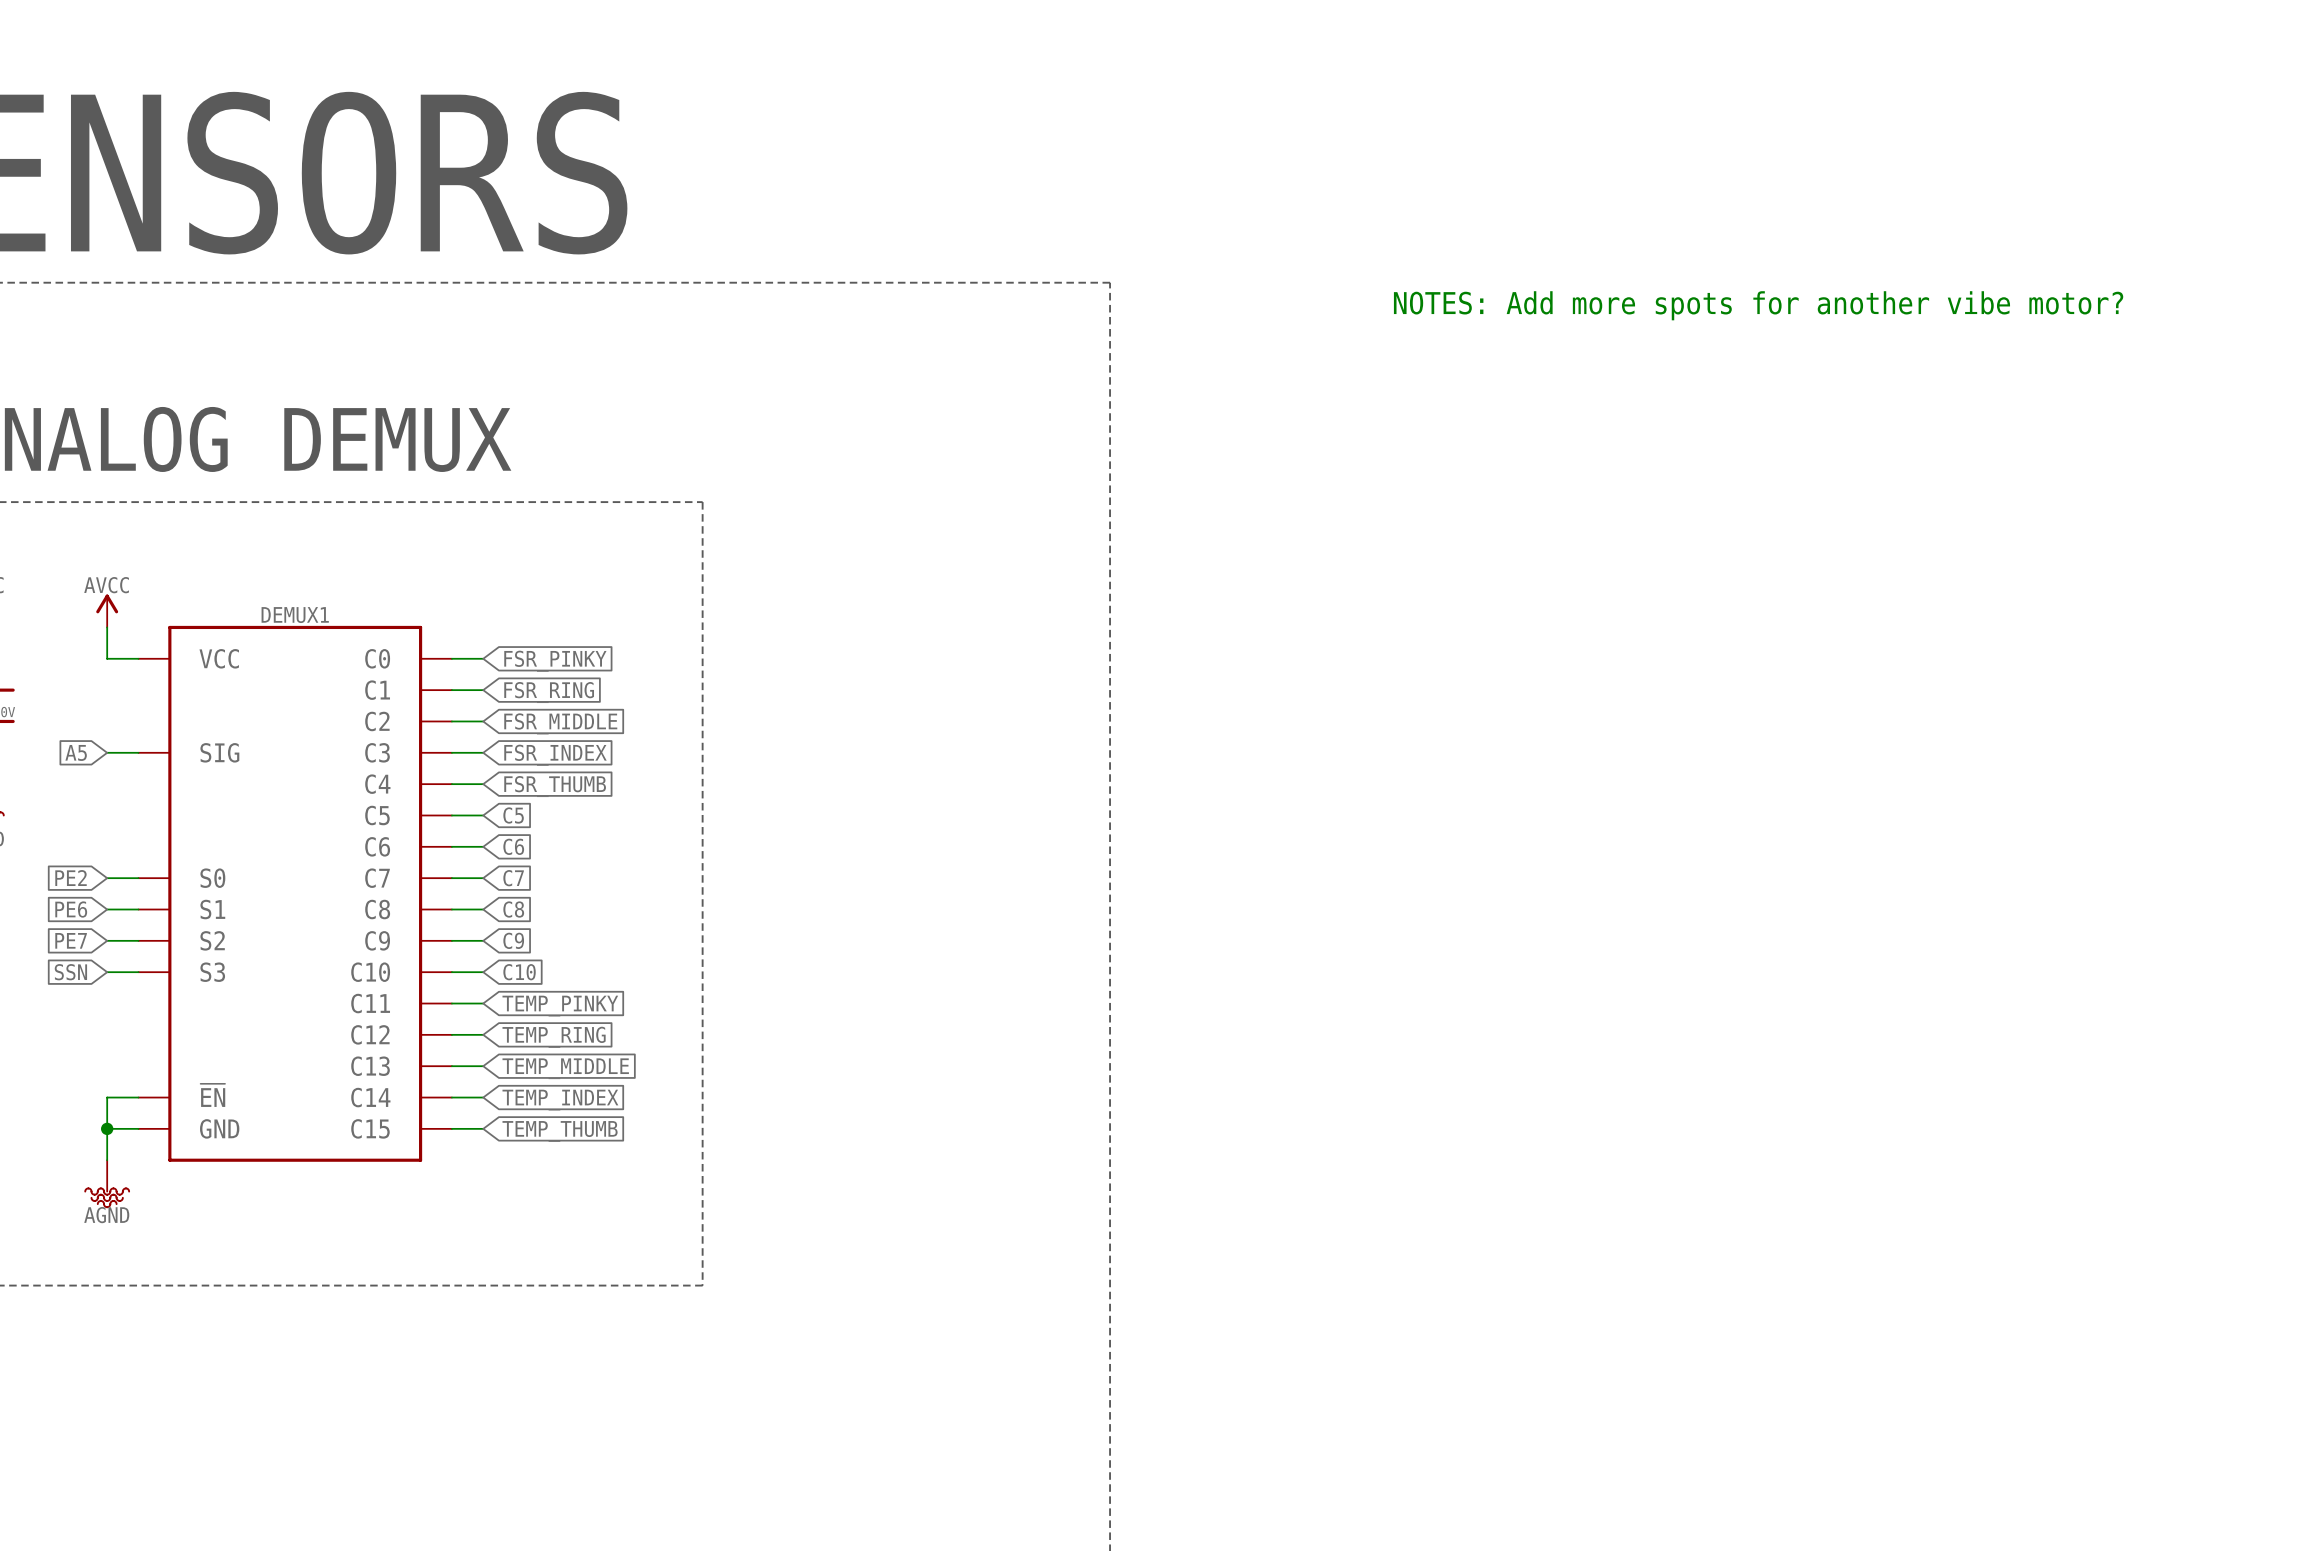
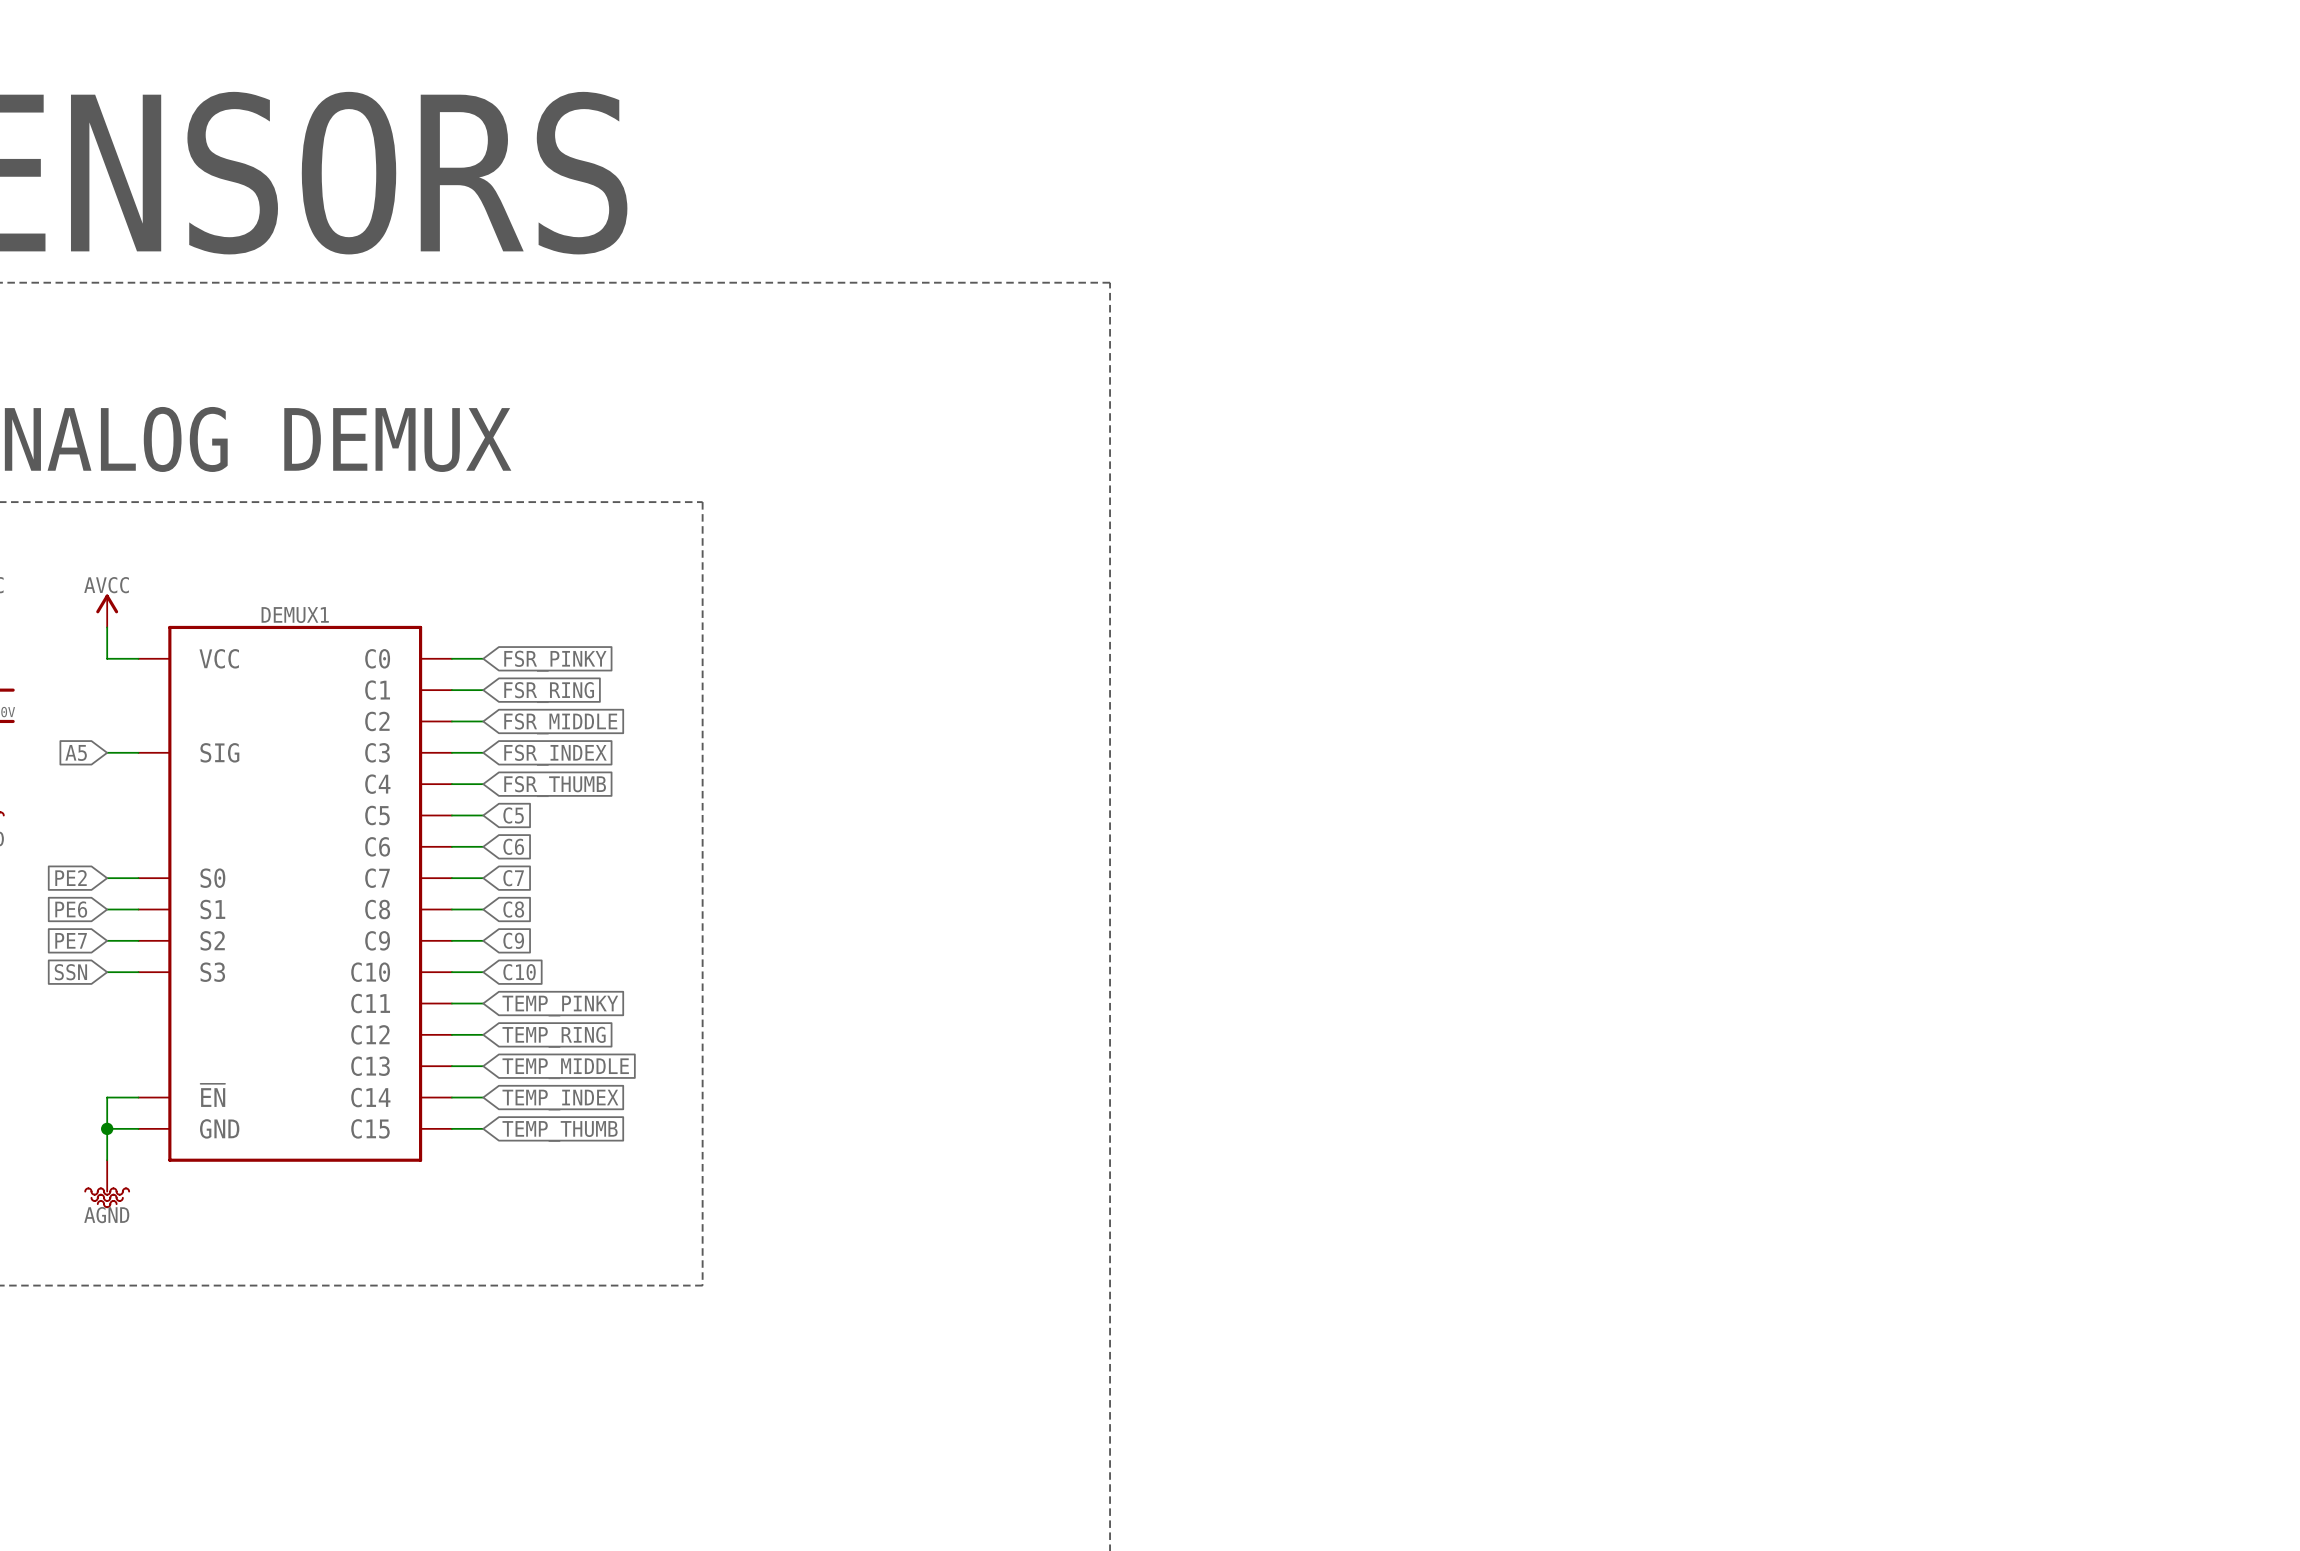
text: NOTES: Add more spots for another vibe motor? (1758, 305) -> none

